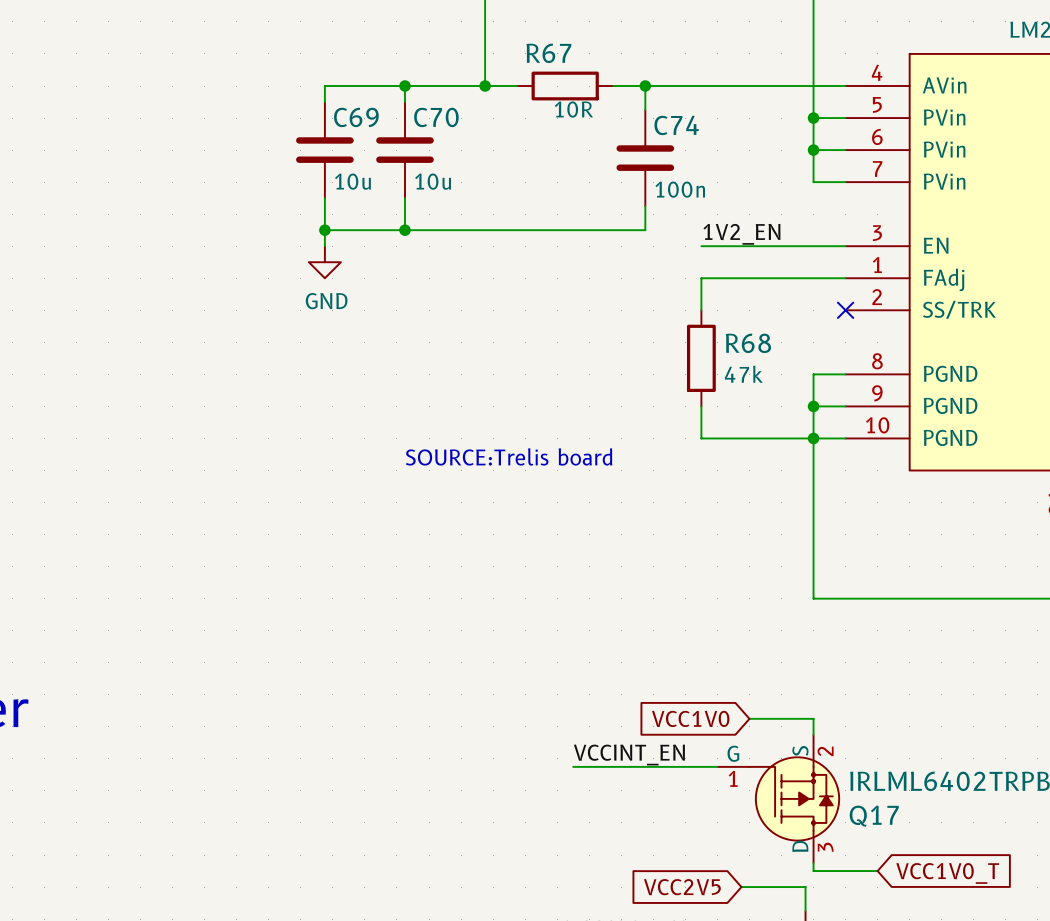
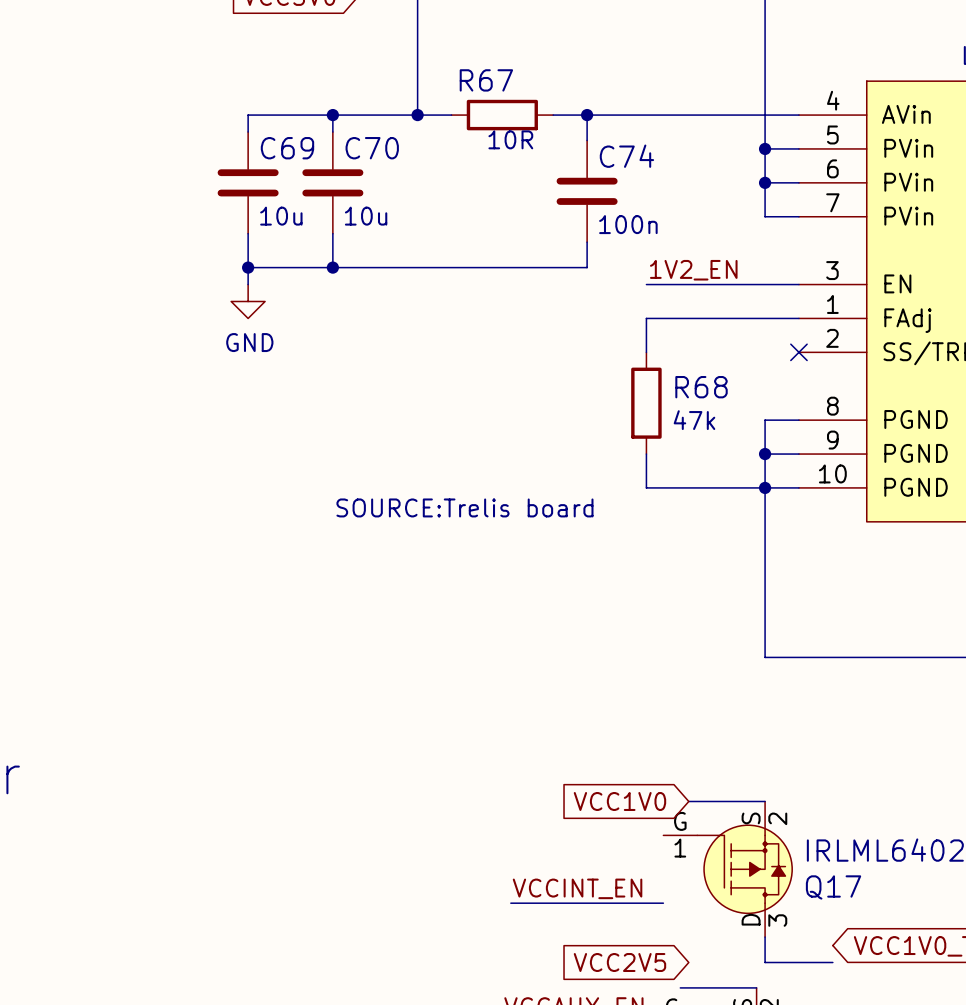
global label position: VCC1V0 (690, 718) -> VCC1V0 (619, 801)
wire: (749, 718) (813, 718) (813, 734) -> (688, 801) (765, 801)
label position: VCCINT_EN (629, 754) -> VCCINT_EN (577, 888)
wire: (573, 766) (717, 766) -> (510, 903) (663, 903)
wire: (813, 871) (877, 871) -> (765, 945) (765, 962) (832, 962)
wire: (741, 887) (805, 887) (805, 911) -> (680, 987) (756, 987)

